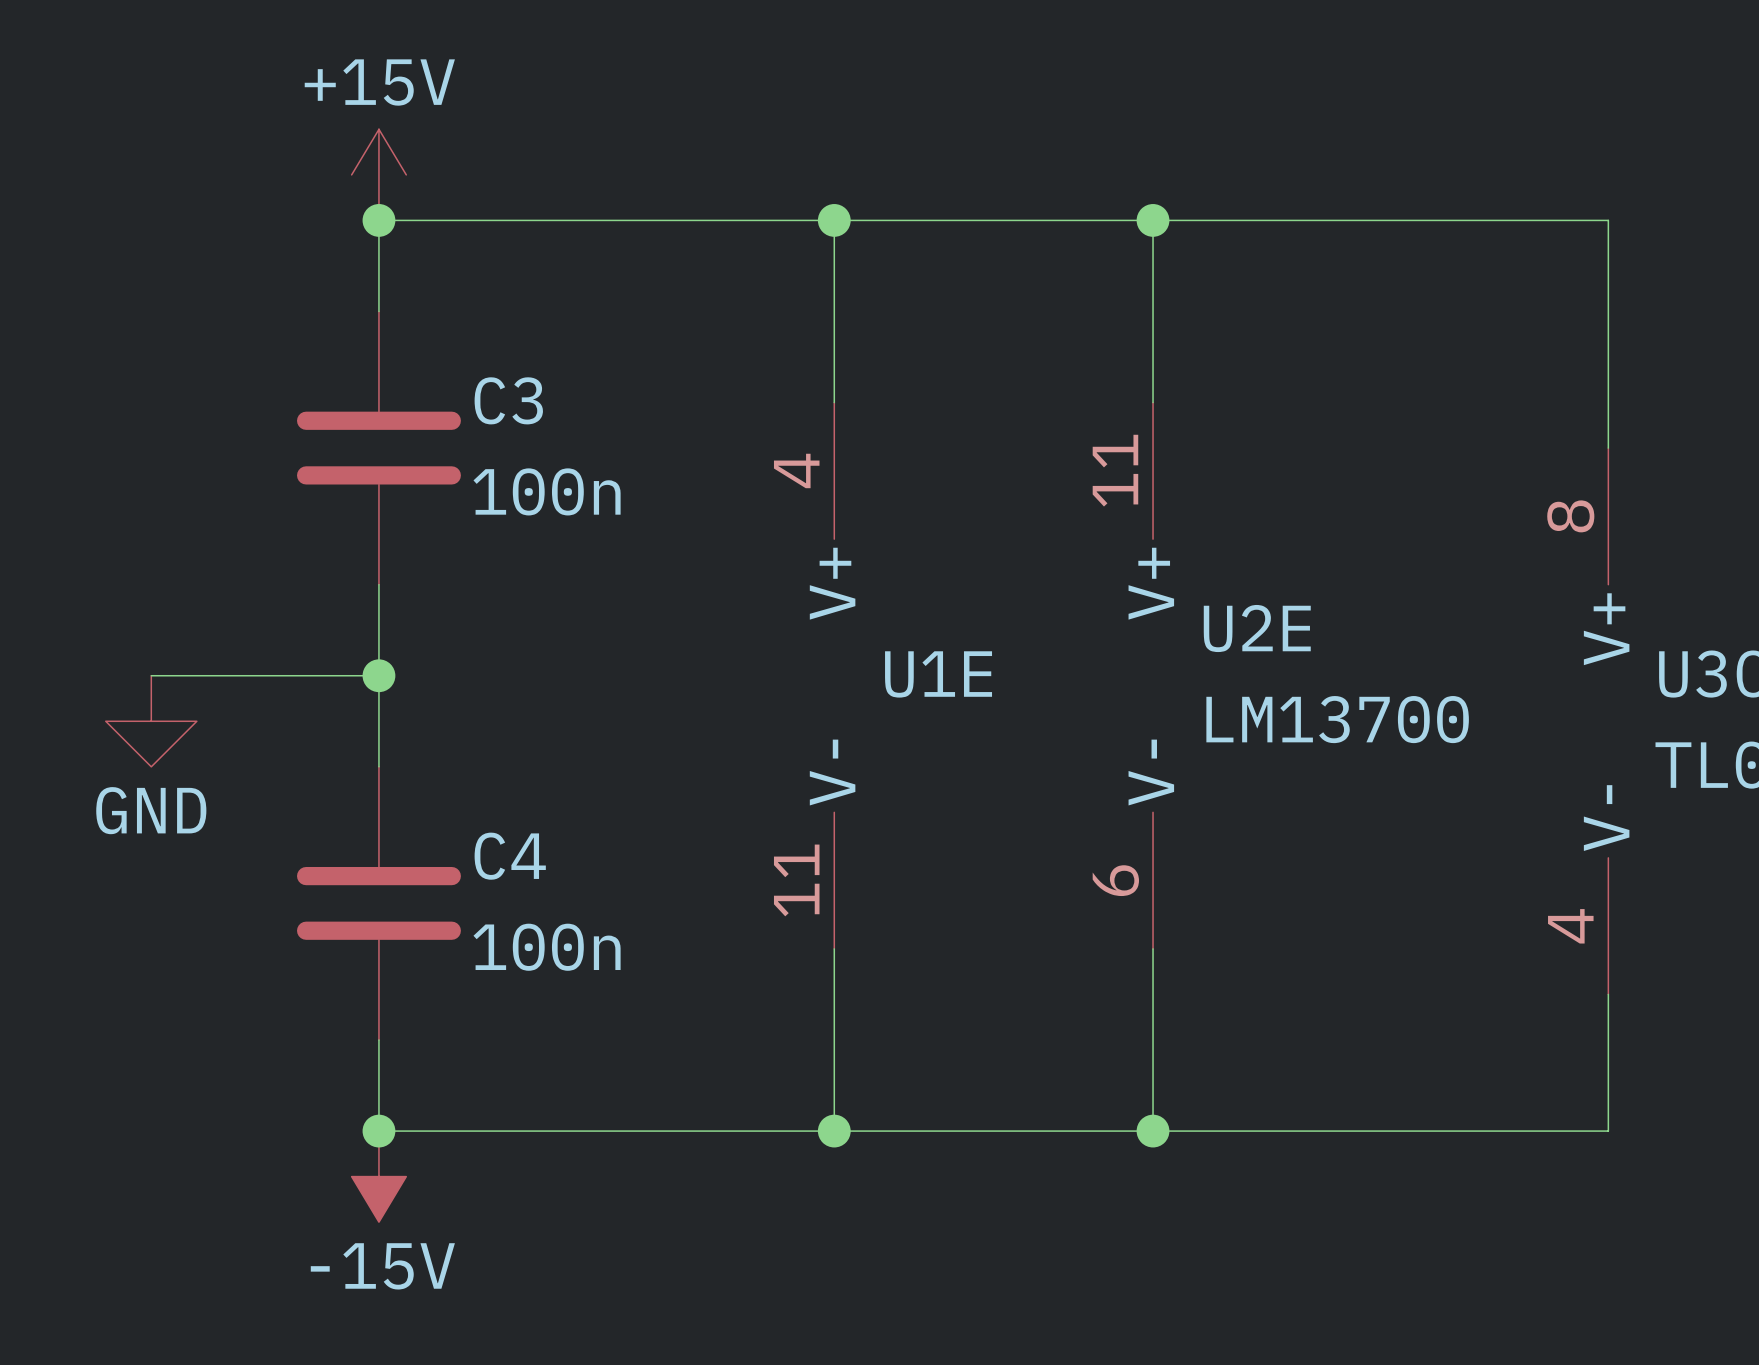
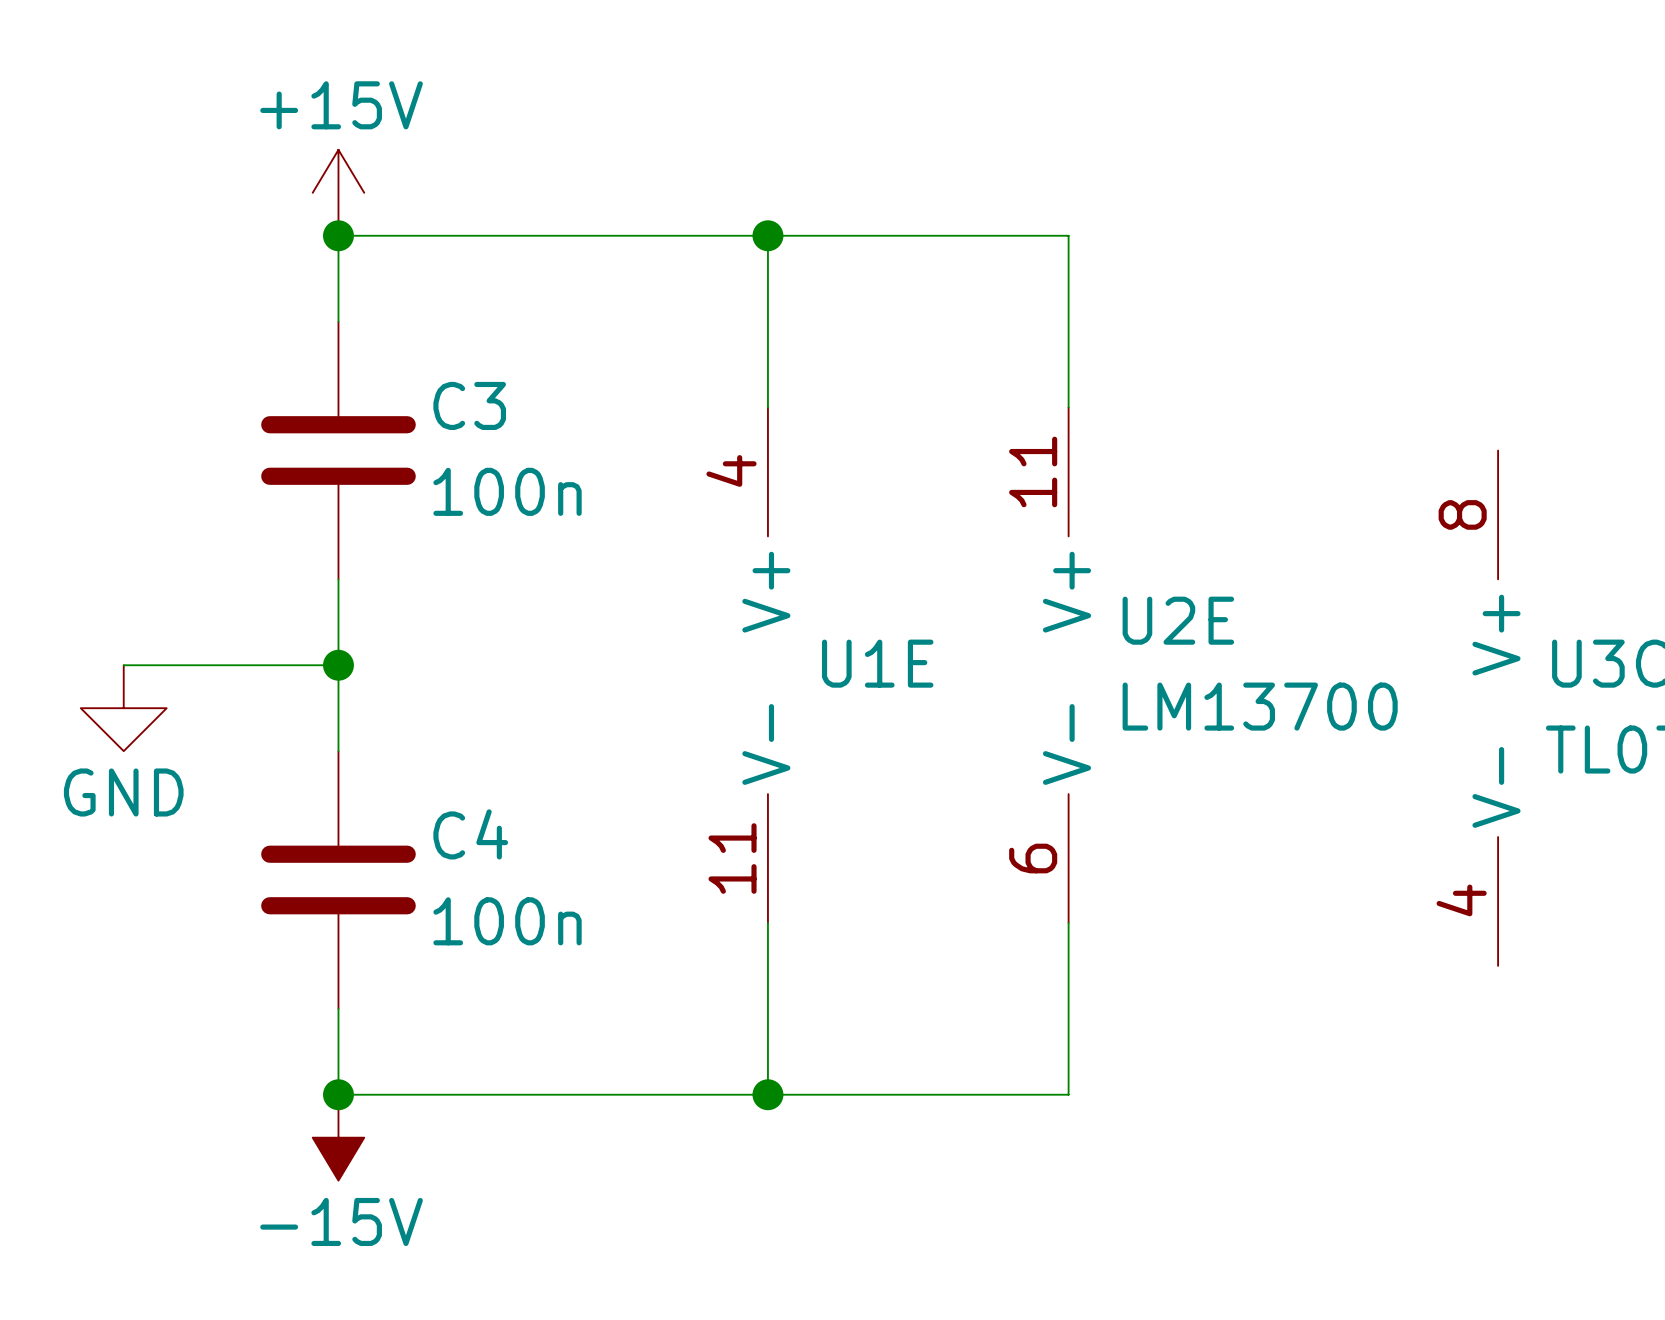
wire: (1153, 220) (1608, 220) (1608, 448) -> none
junction: (1153, 220) -> none
wire: (1608, 994) (1608, 1131) (1153, 1131) -> none
junction: (1153, 1131) -> none

